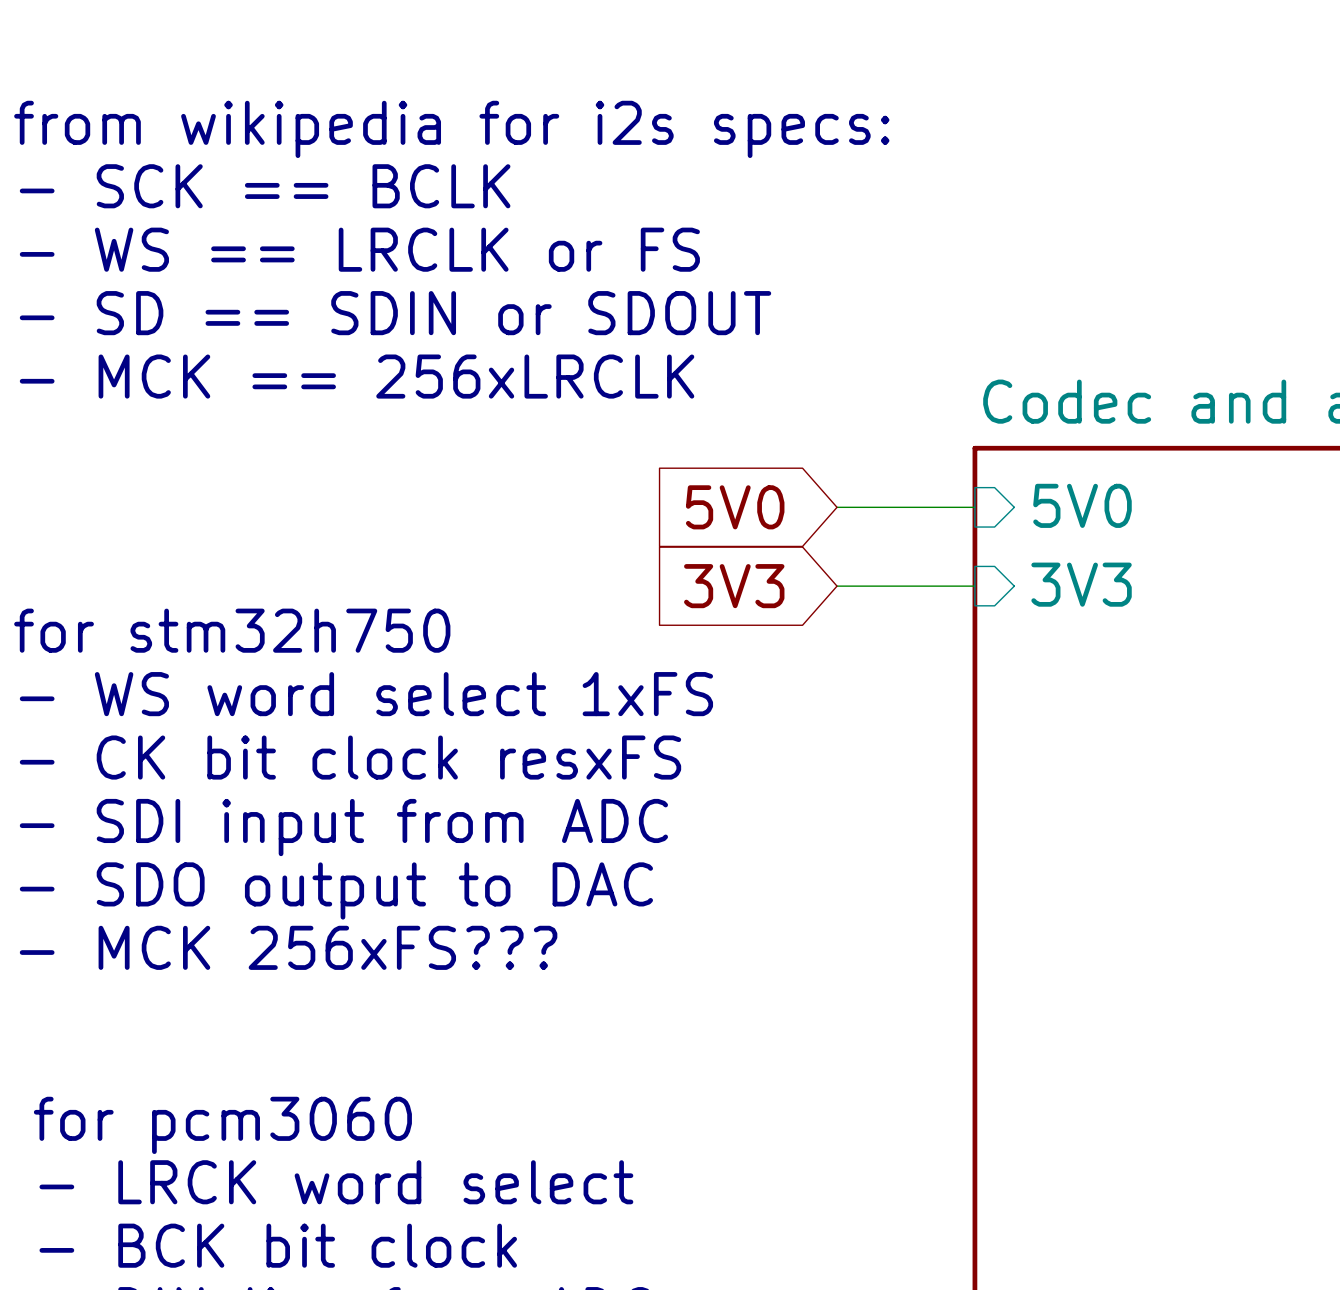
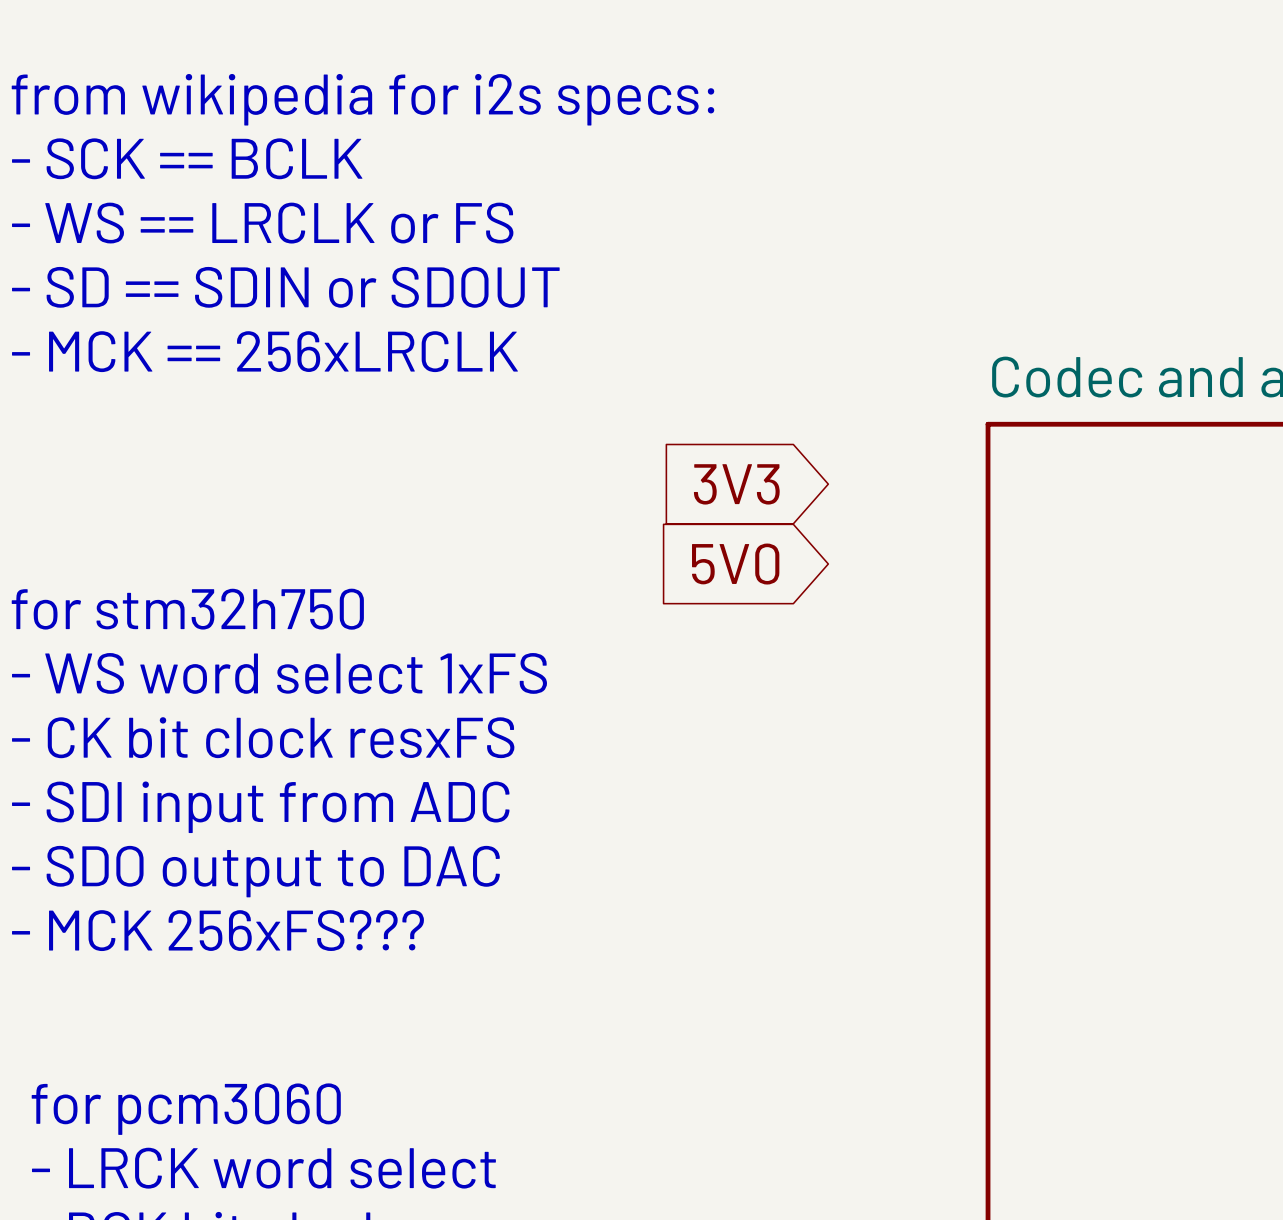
sheet pin: 5V0 (1082, 505) -> none
global label position: 5V0 (735, 507) -> 5V0 (735, 564)
wire: (837, 507) (974, 507) -> none
sheet pin: 3V3 (1081, 584) -> none
global label position: 3V3 (734, 586) -> 3V3 (736, 484)
wire: (837, 586) (974, 586) -> none

